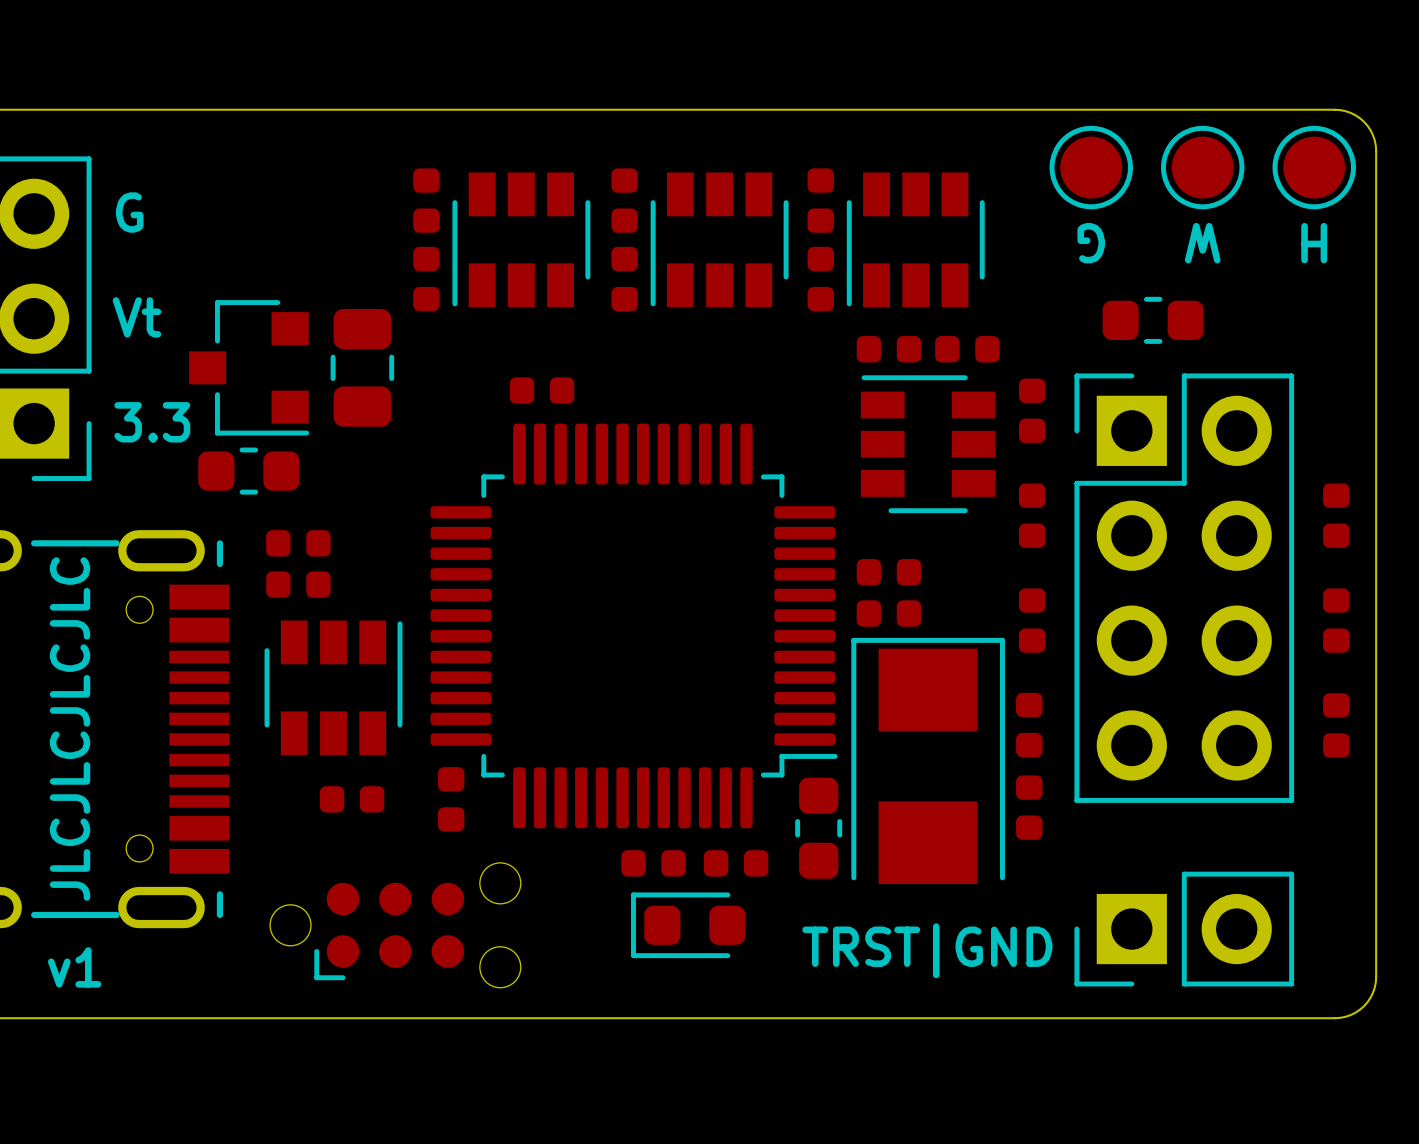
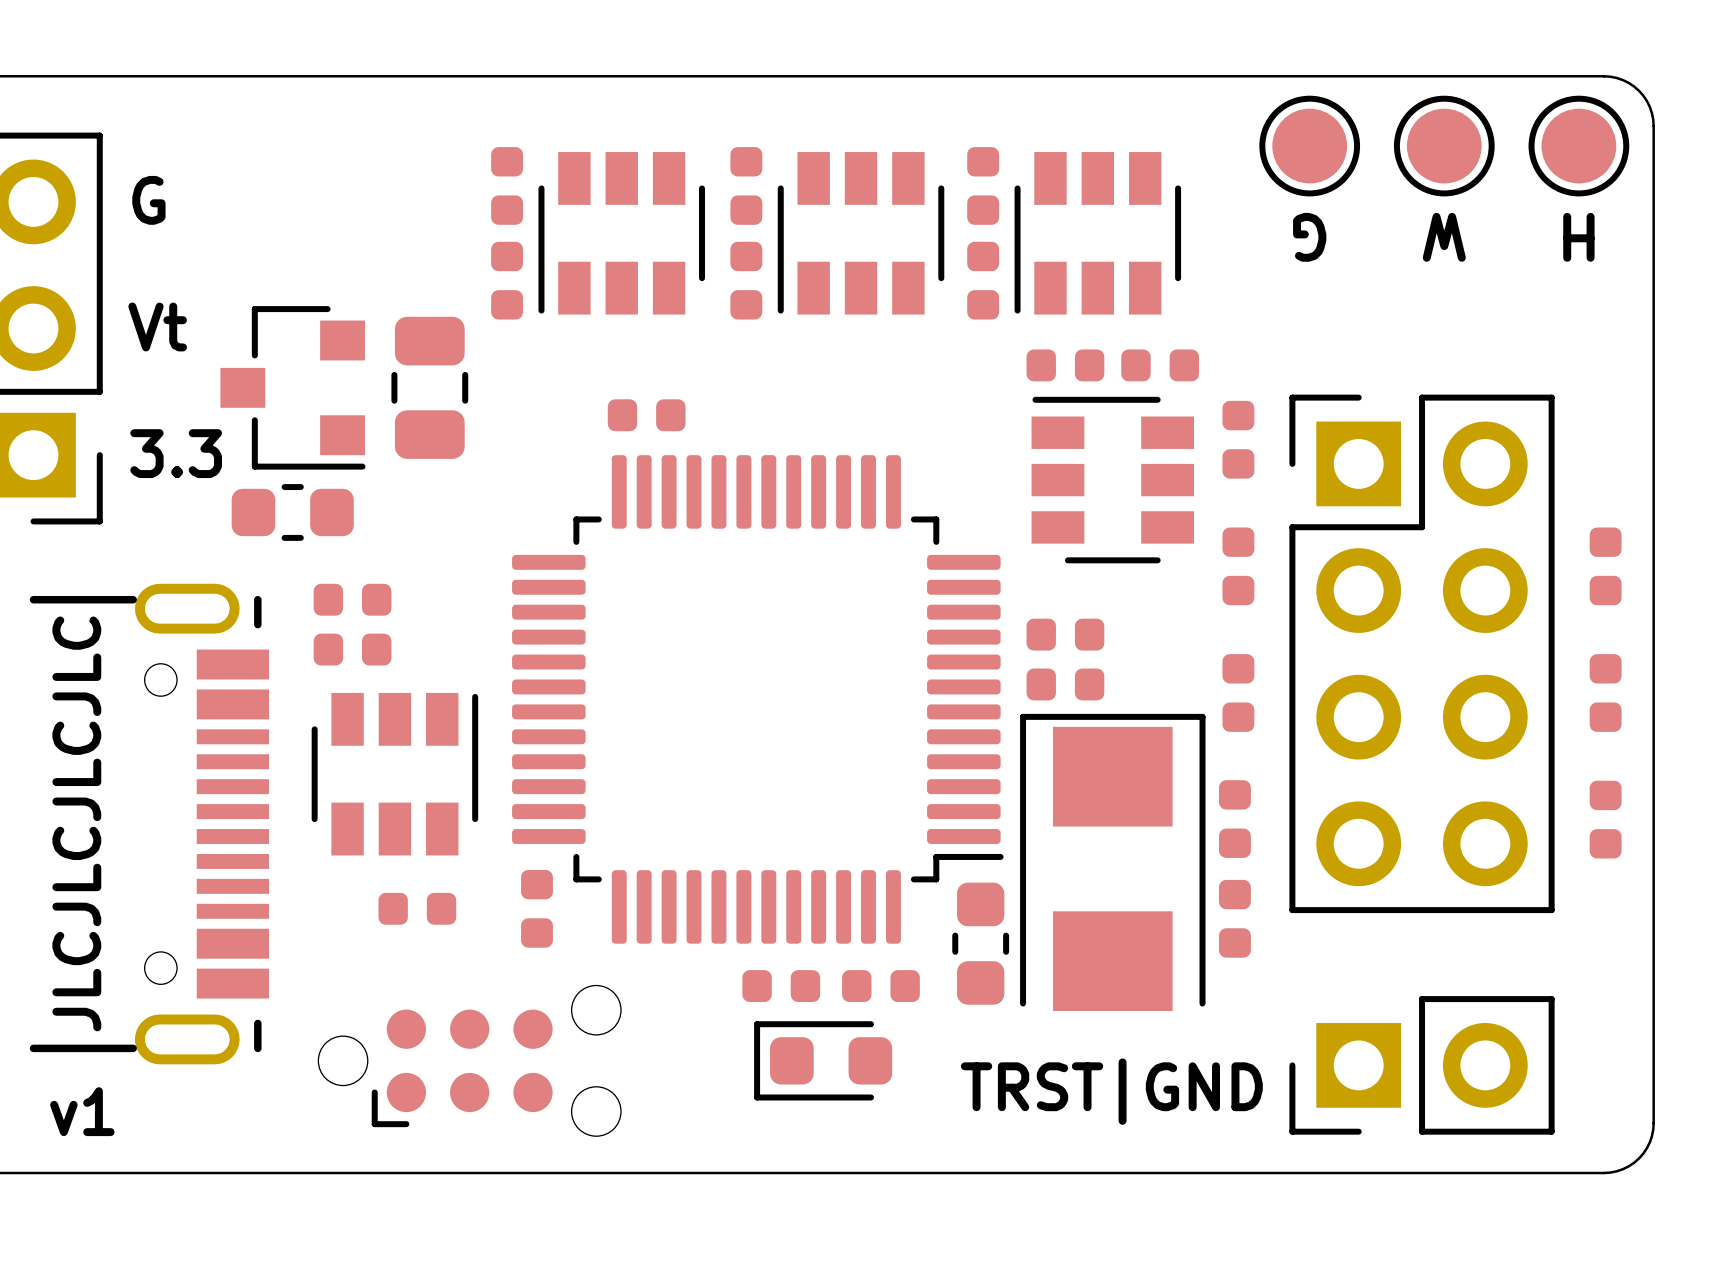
part: (1153, 320) -> none

